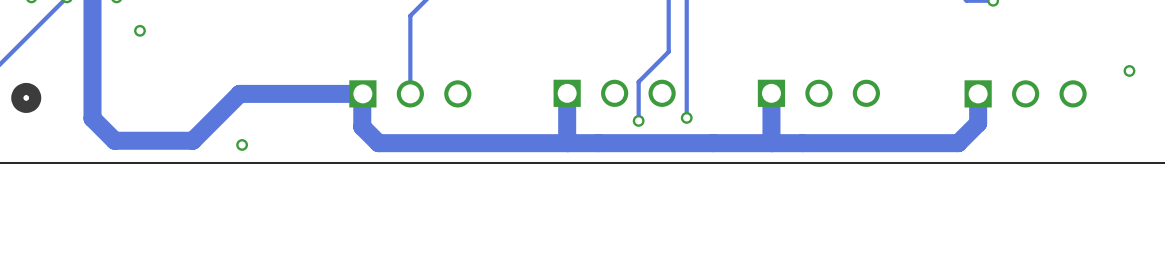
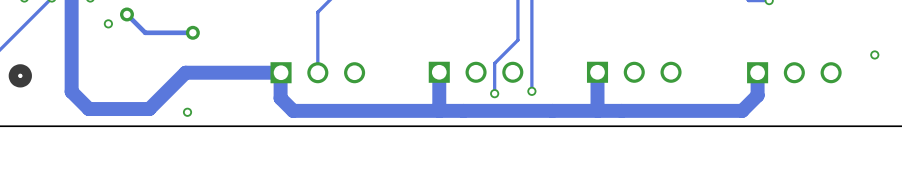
track: none -> (126, 14) (145, 32) (192, 32)
via: none -> (126, 14)
via: none -> (192, 32)

